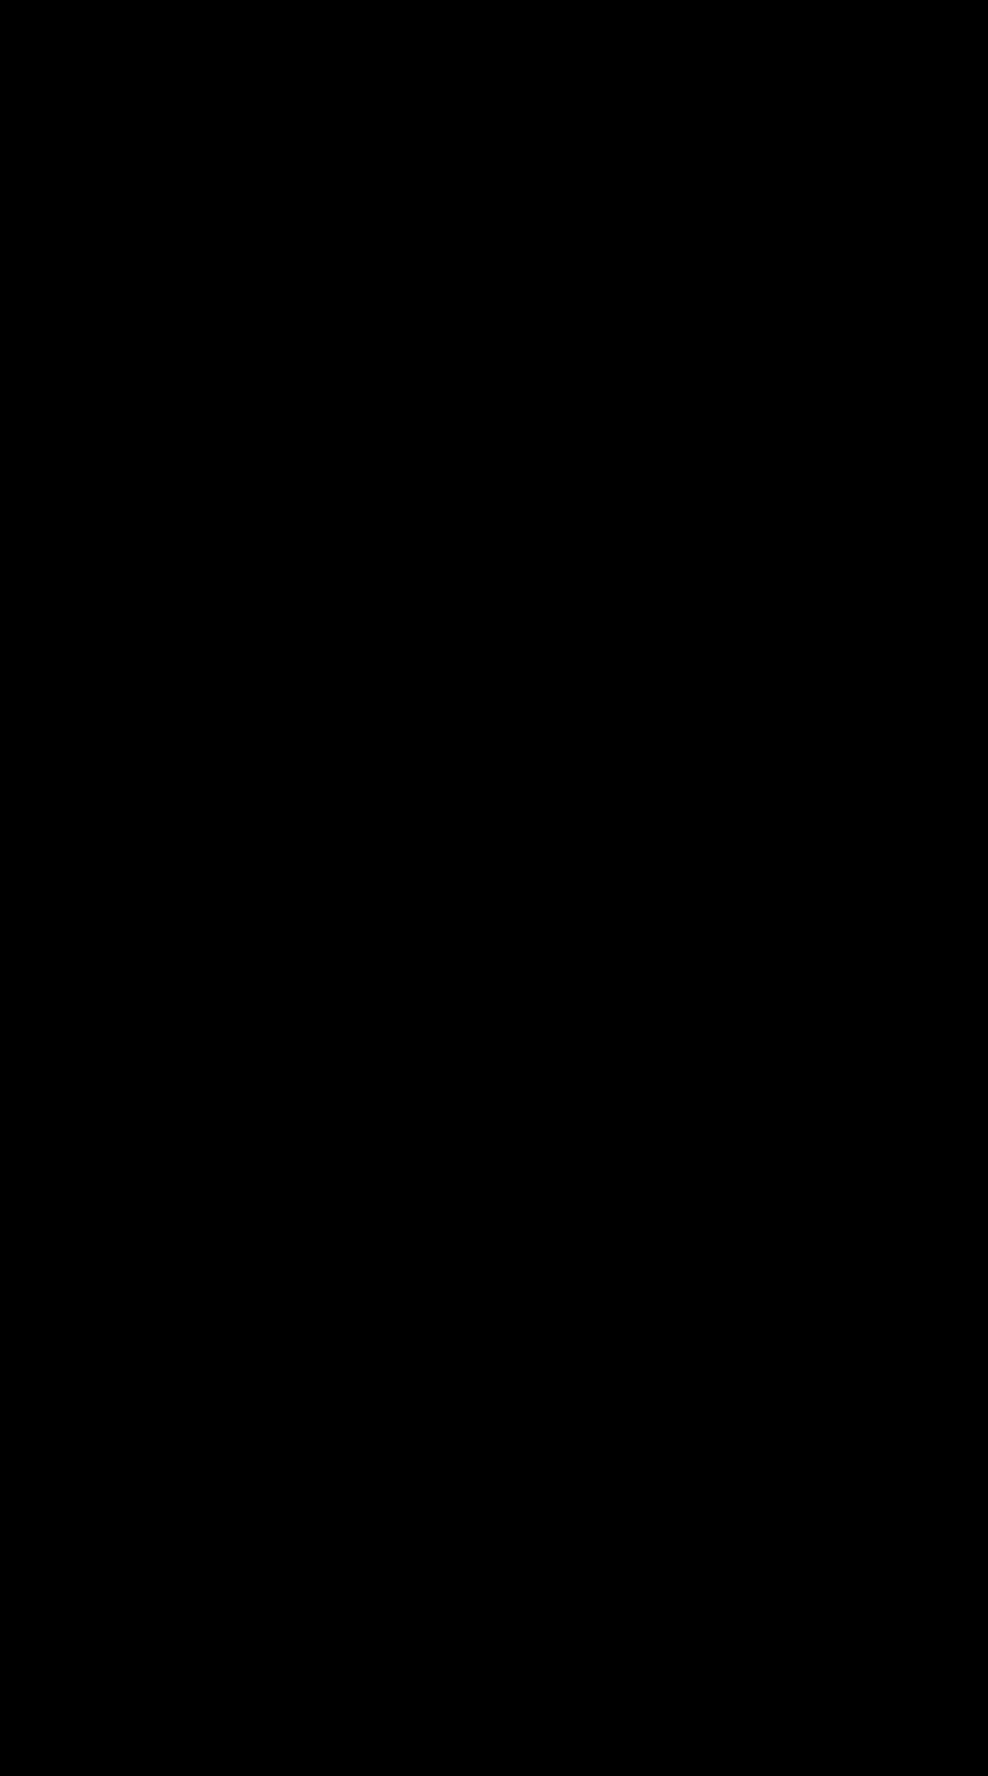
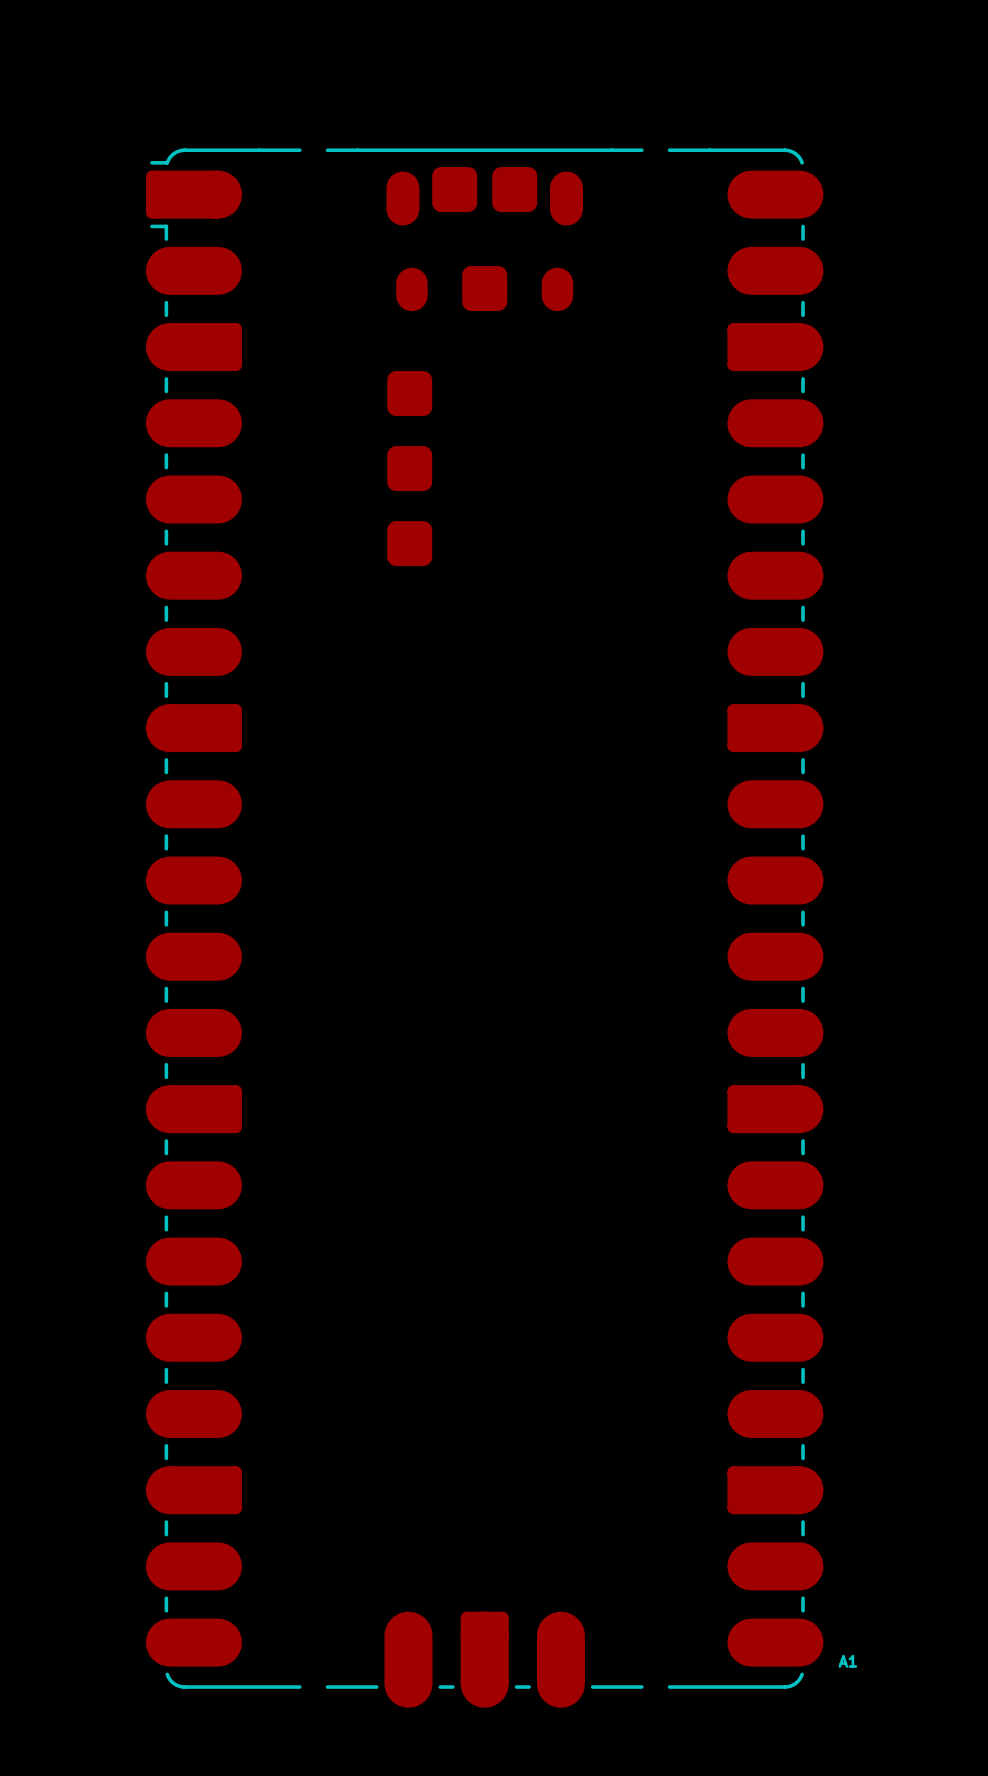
A1: none -> (484, 928)

